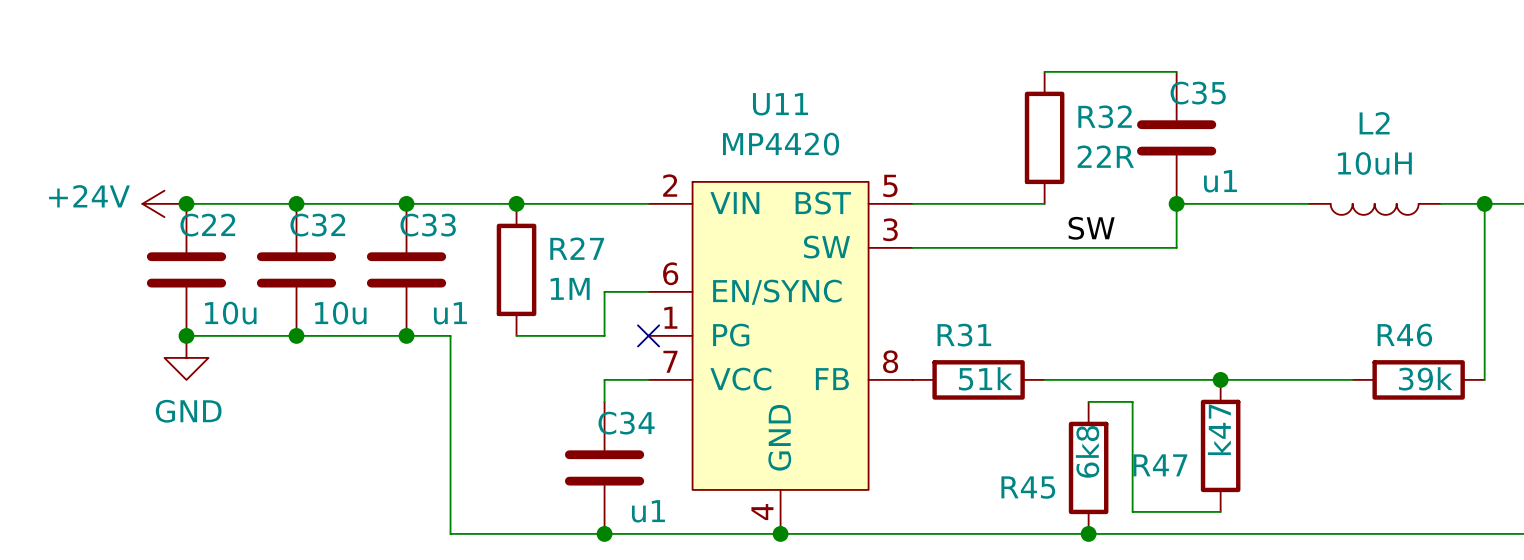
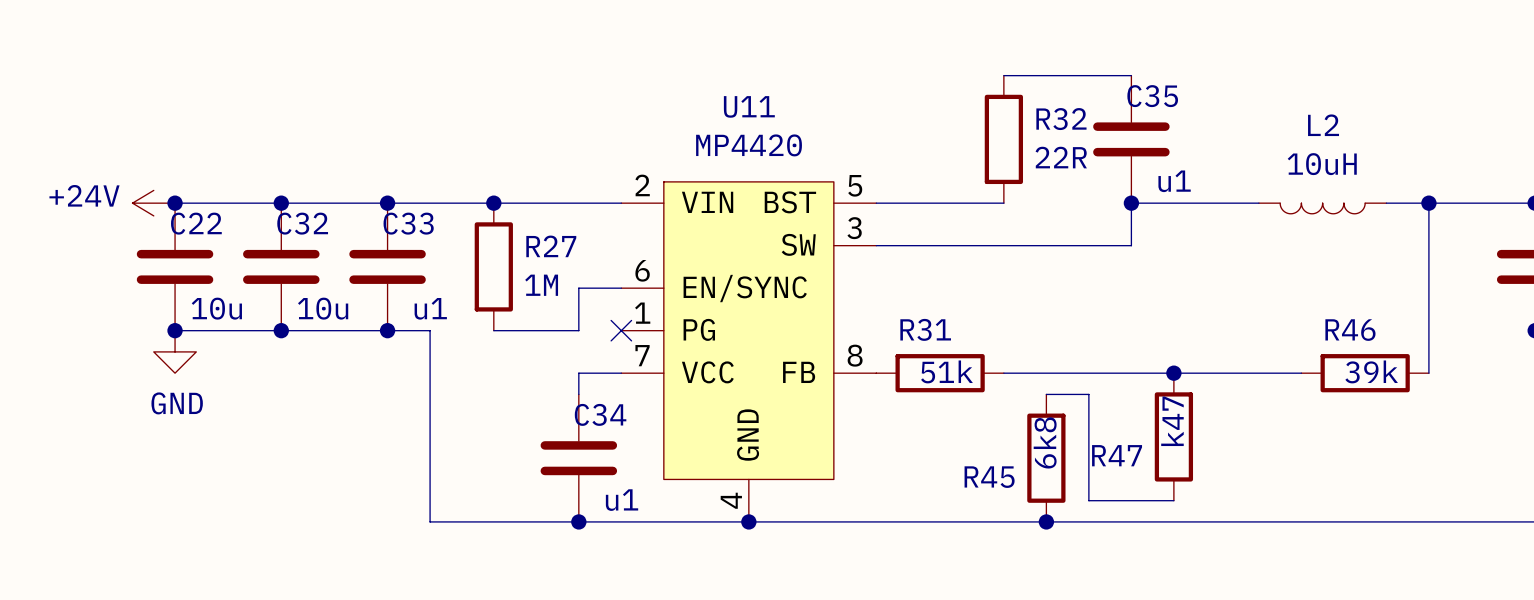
label: SW (1091, 228) -> none

